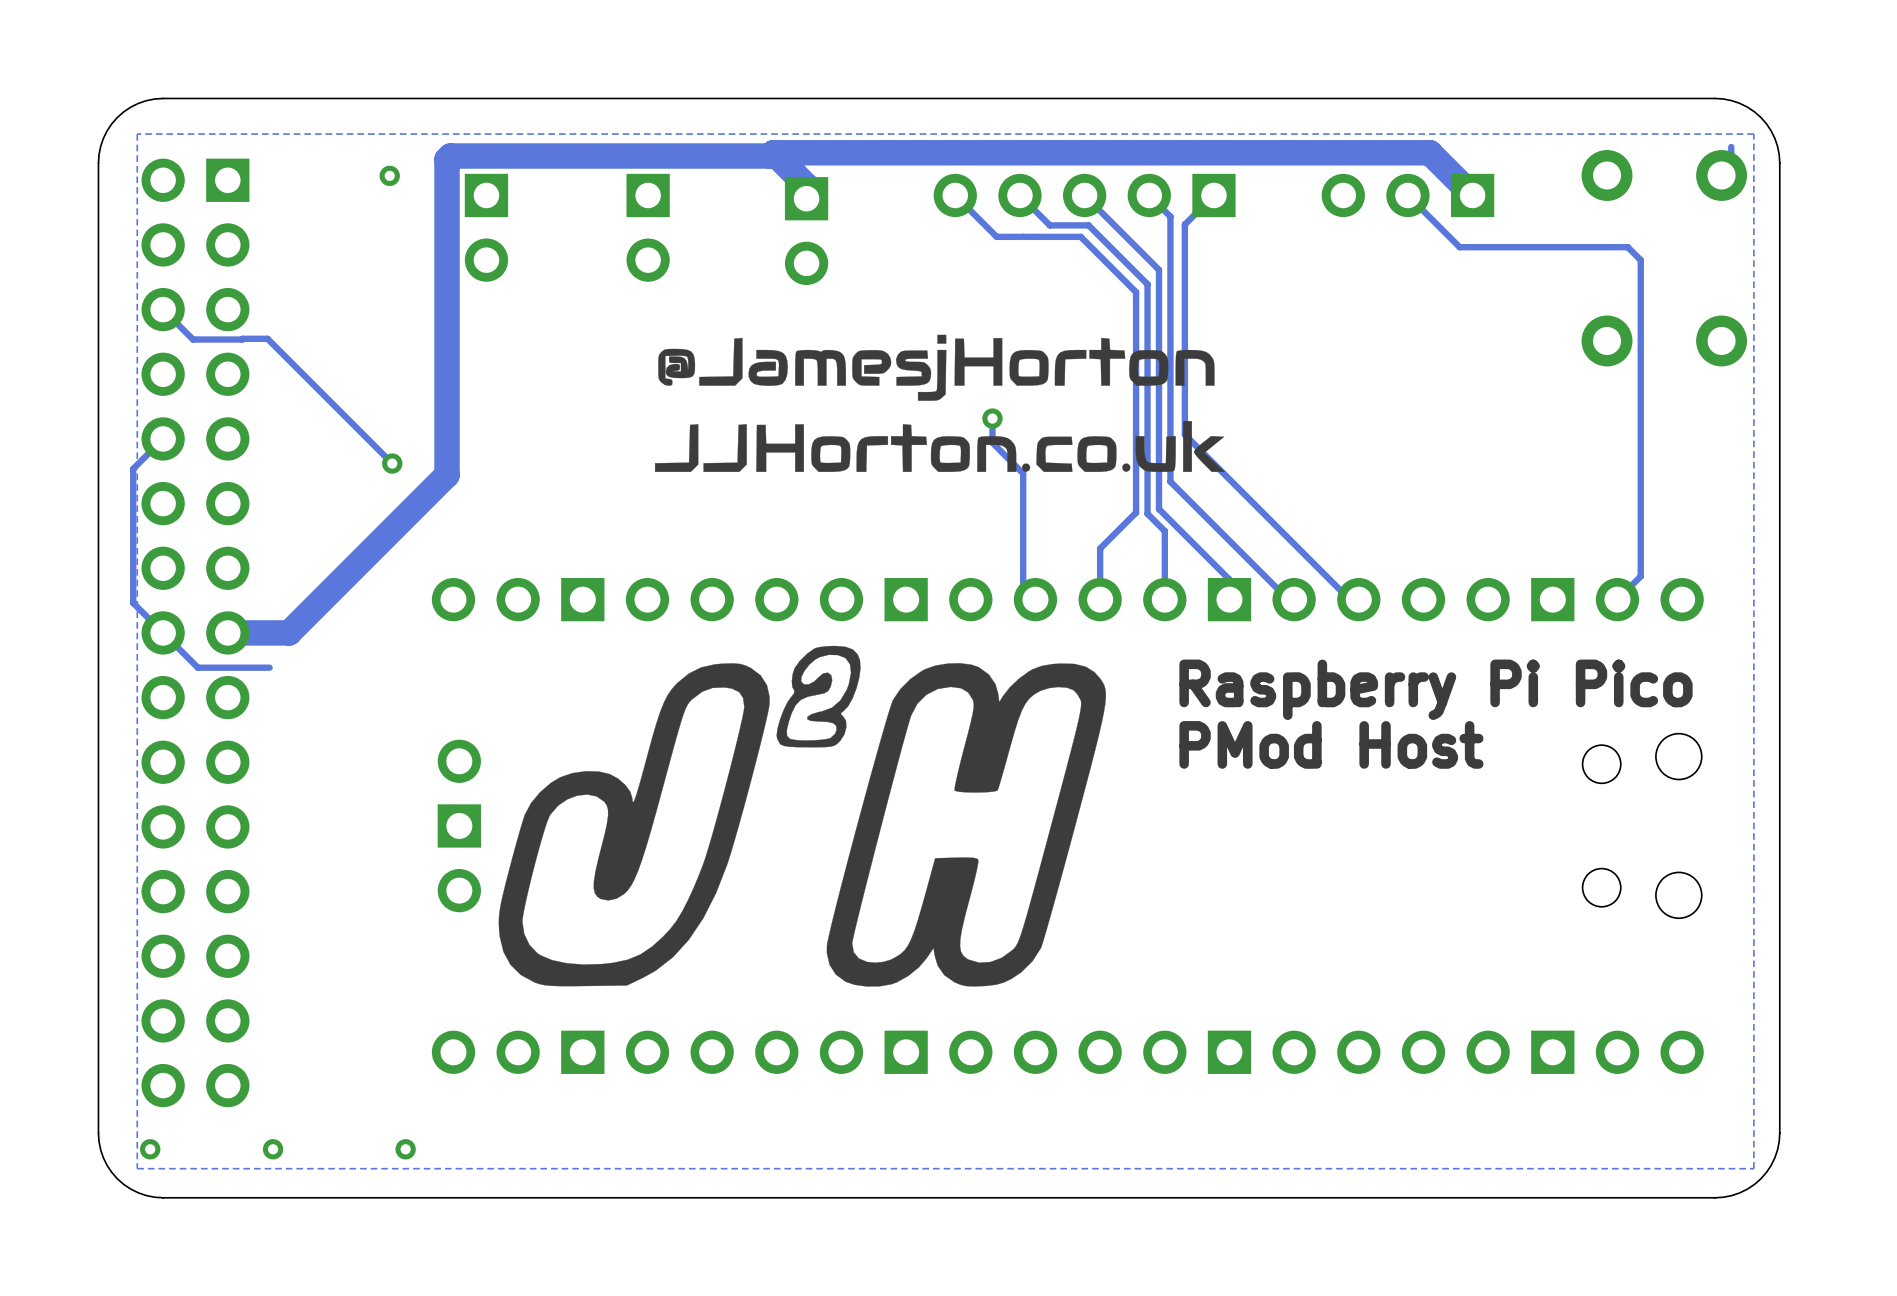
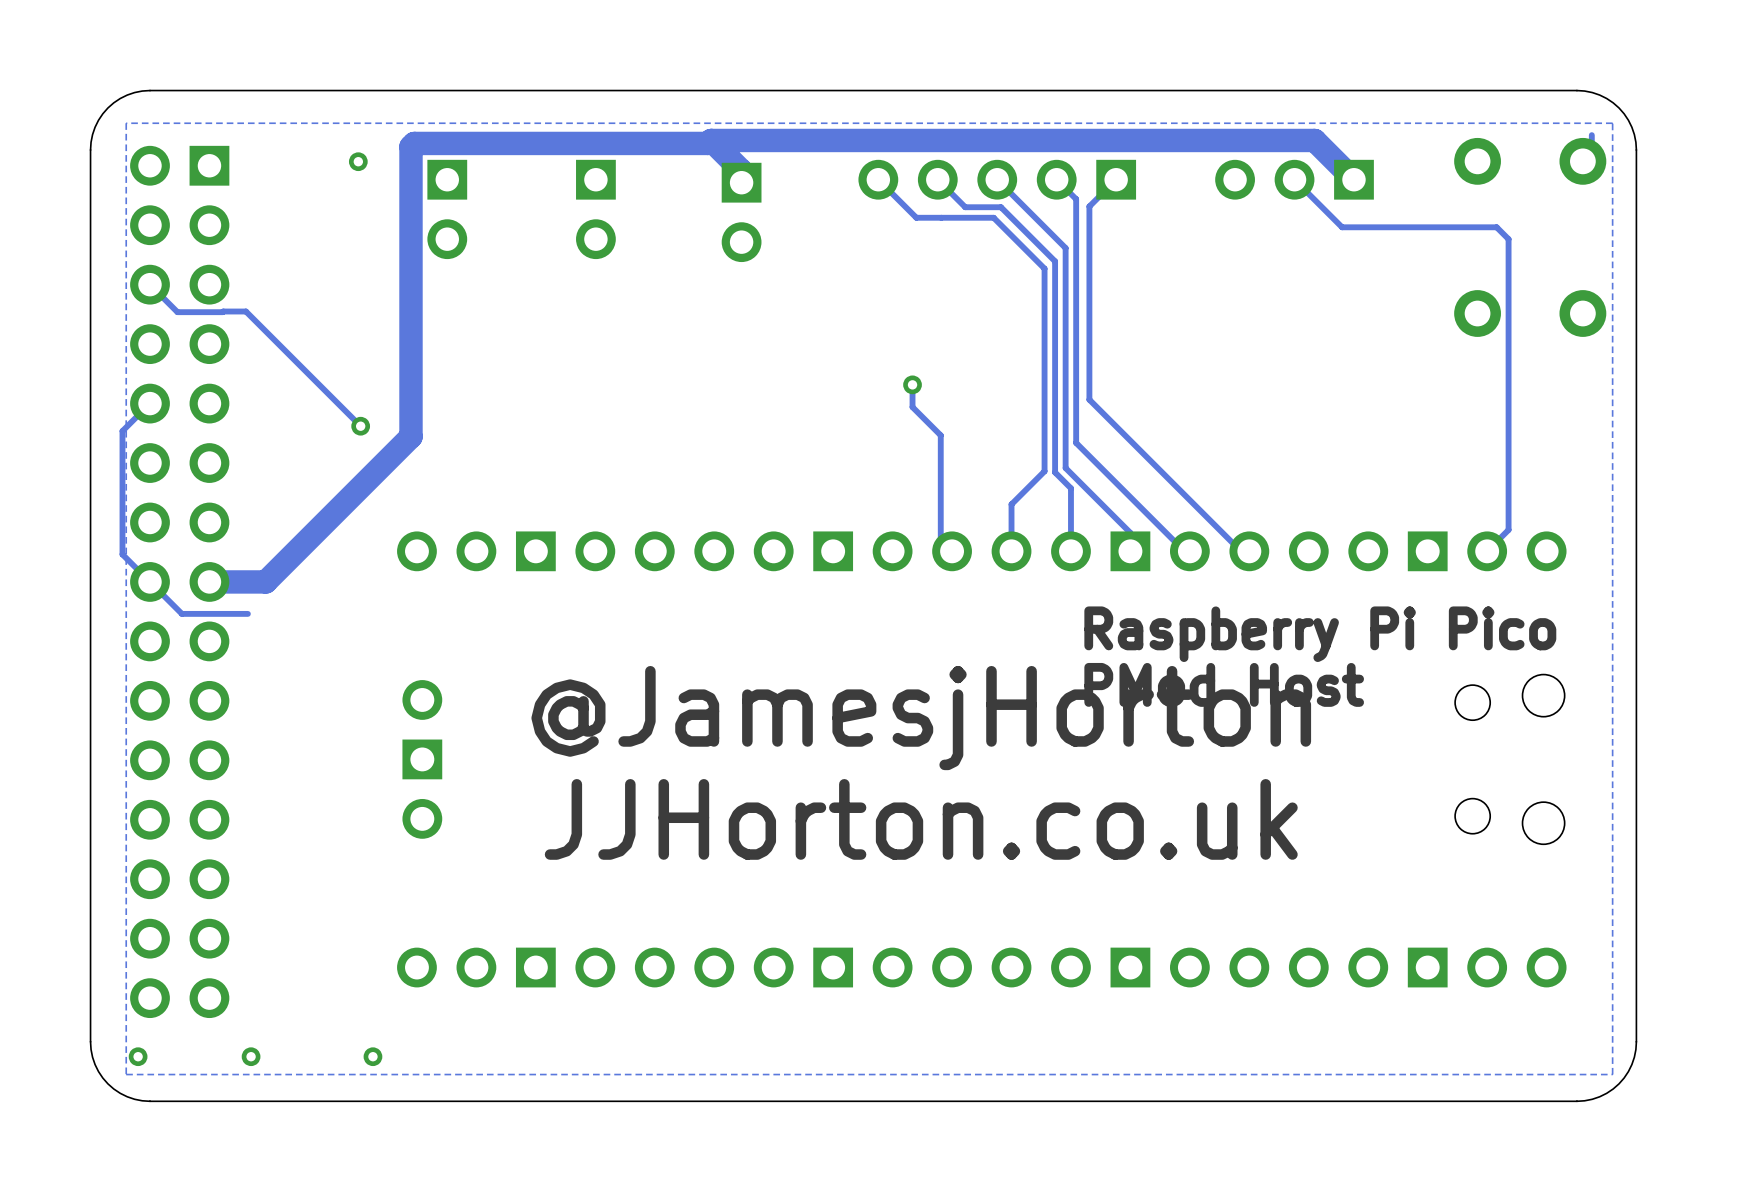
drawing: [654, 334, 1225, 472] -> none
drawing: [498, 645, 1106, 987] -> none
text: none -> @JamesjHorton (921, 718)
text: none -> JJHorton.co.uk (921, 819)

